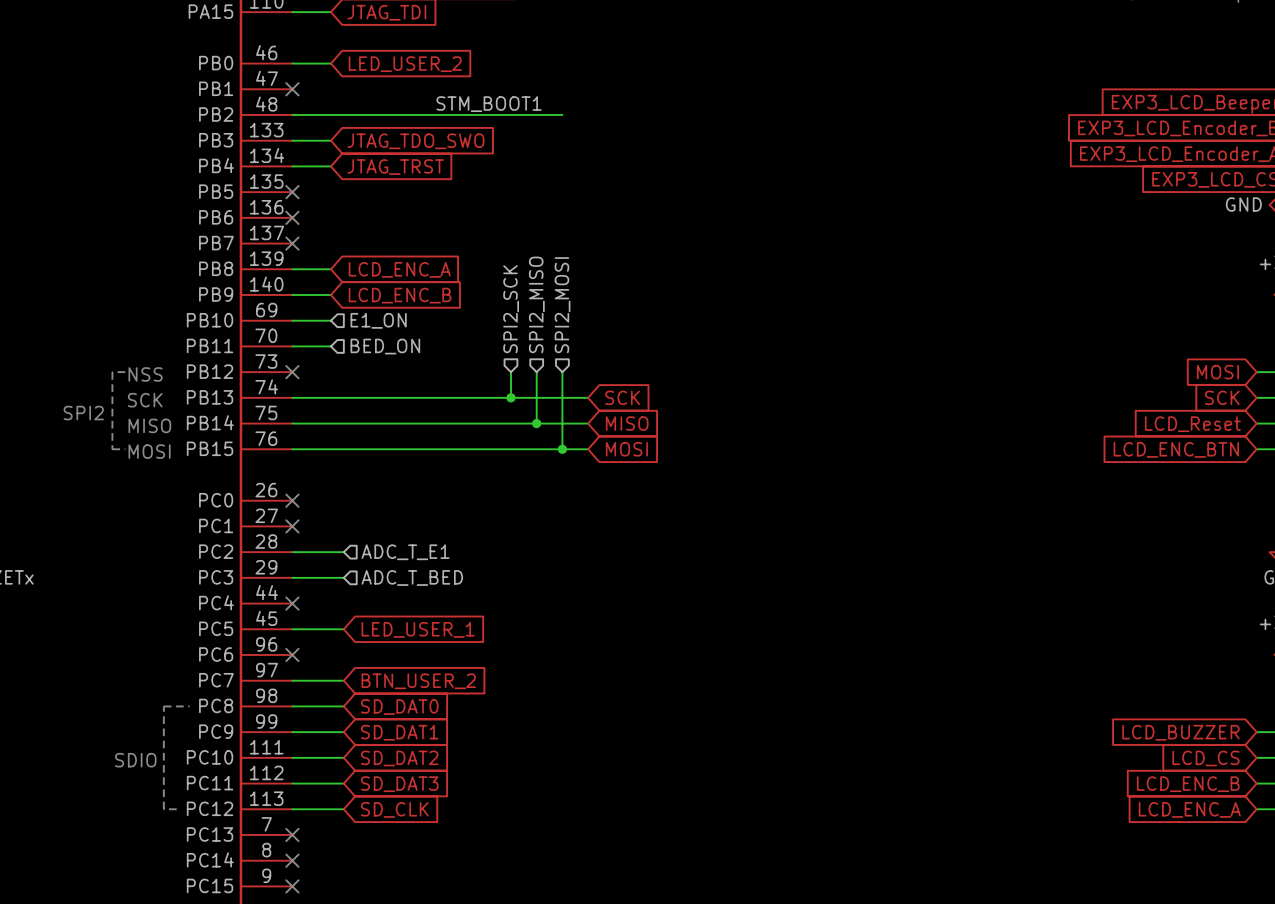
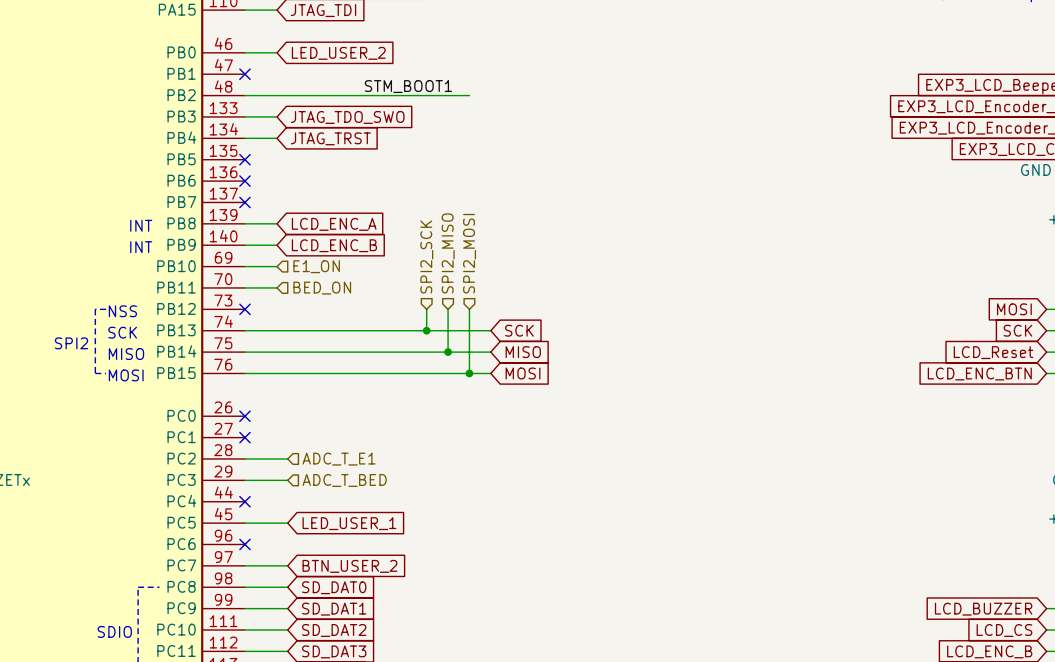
text: none -> INT (141, 225)
text: none -> INT (141, 247)

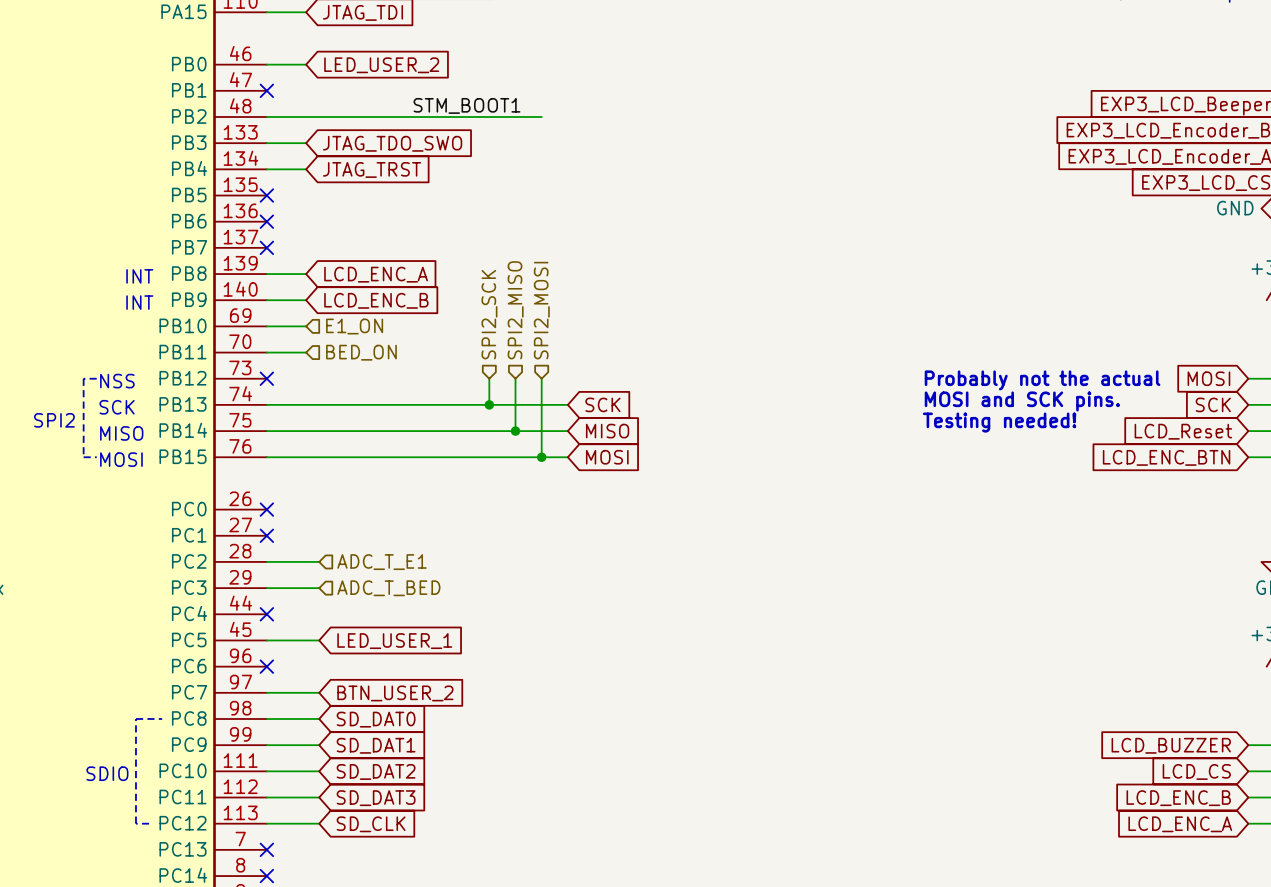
text: none -> Probably not the actual (1042, 380)
text: none -> MOSI and SCK pins. (1022, 401)
text: none -> Testing needed! (999, 422)

